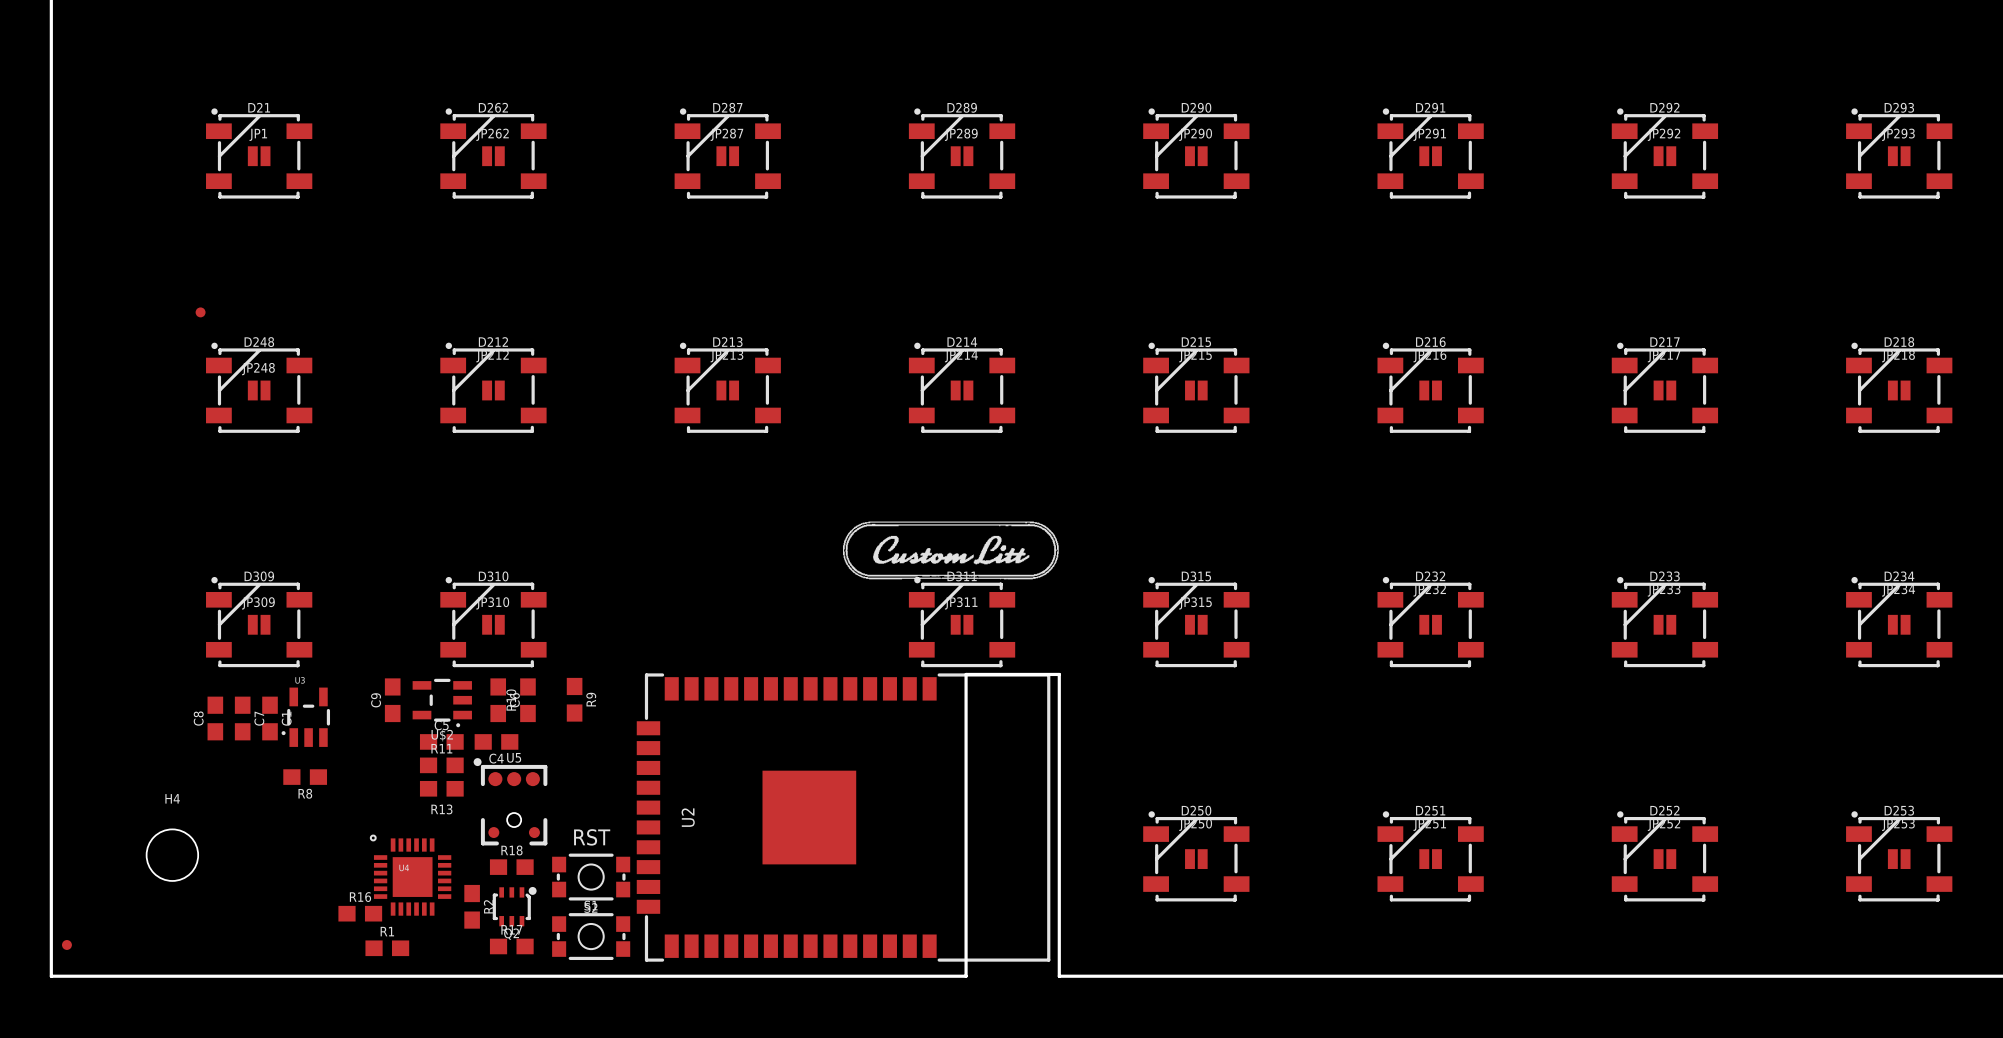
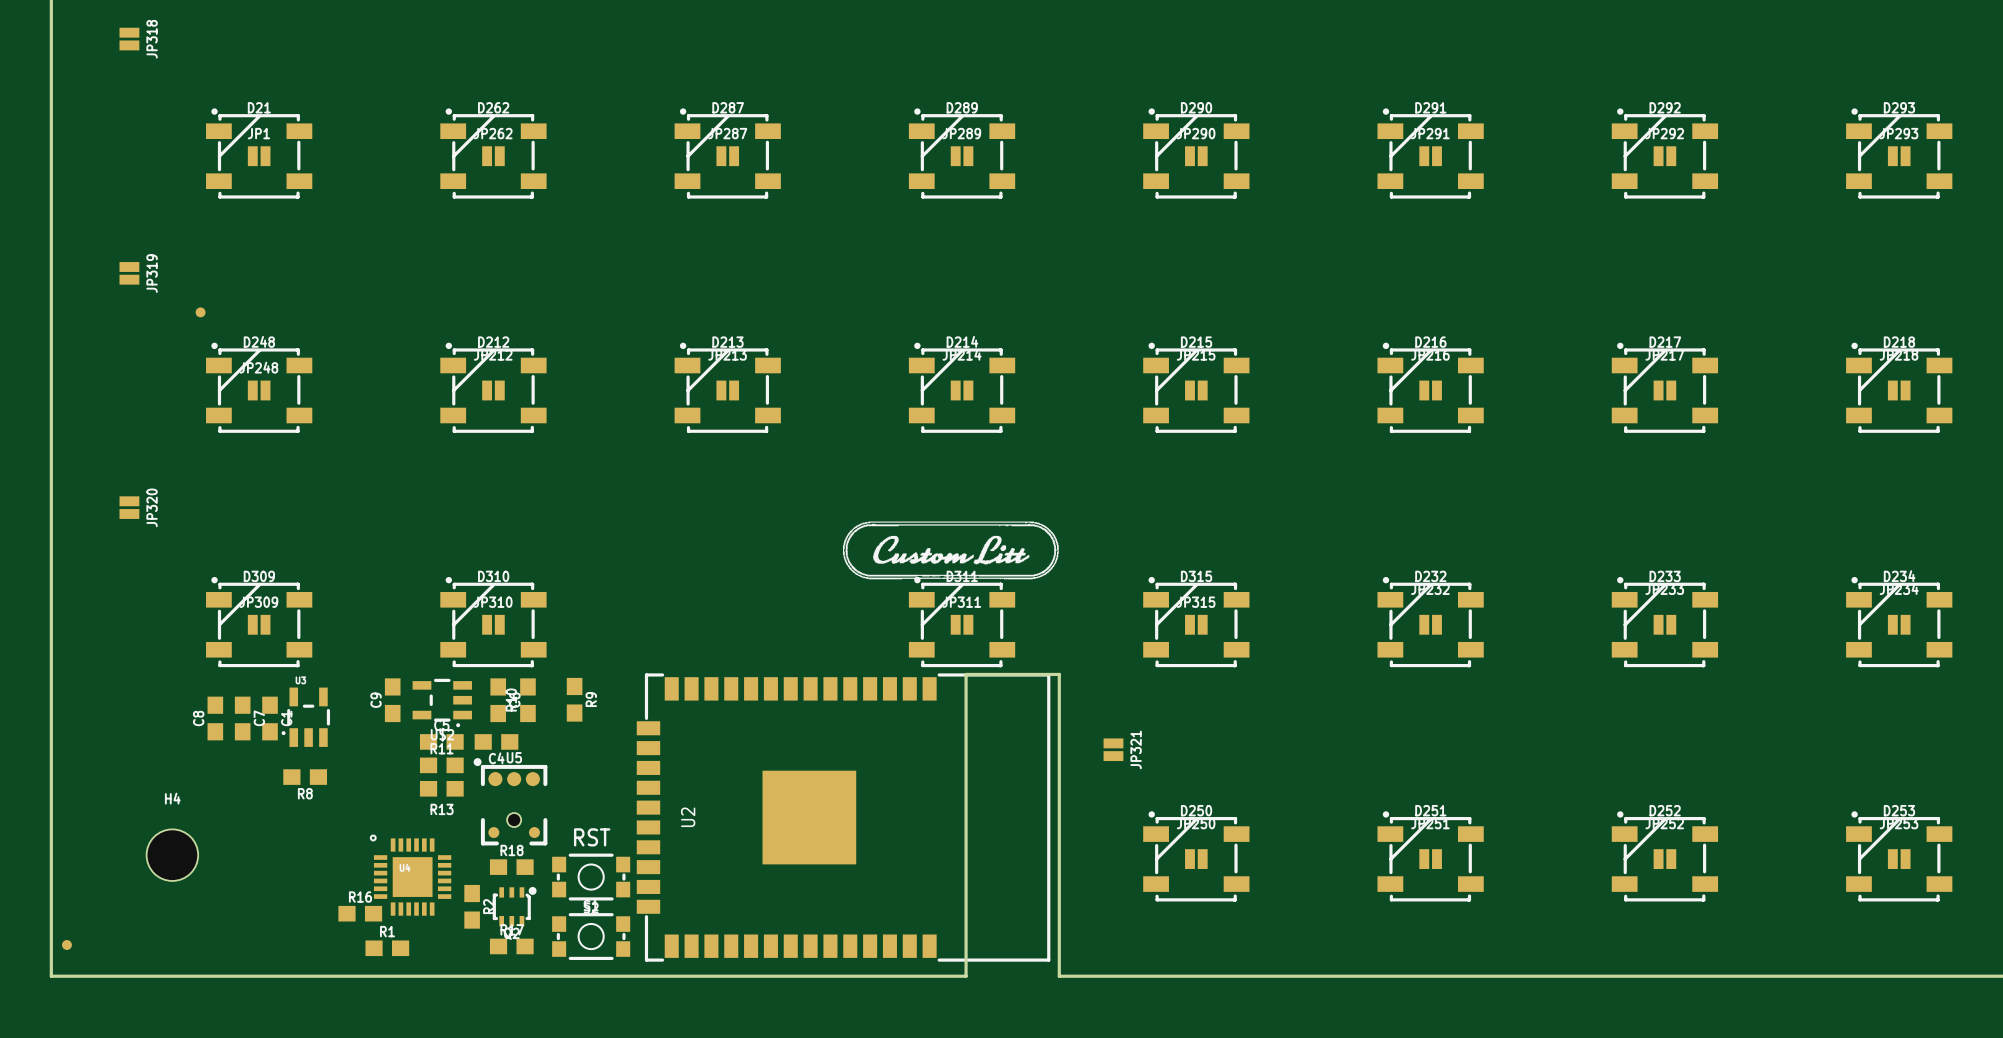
JP318: none -> (129, 39)
JP319: none -> (129, 273)
JP320: none -> (129, 507)
JP321: none -> (1113, 749)

